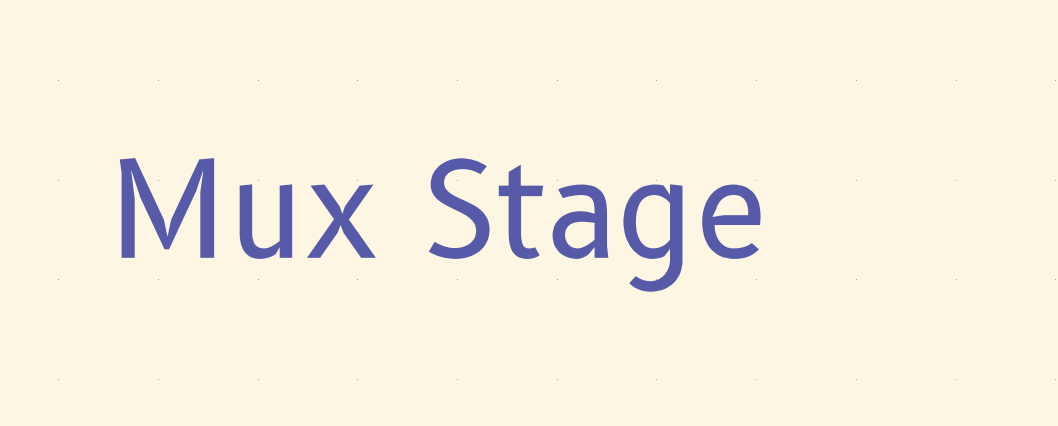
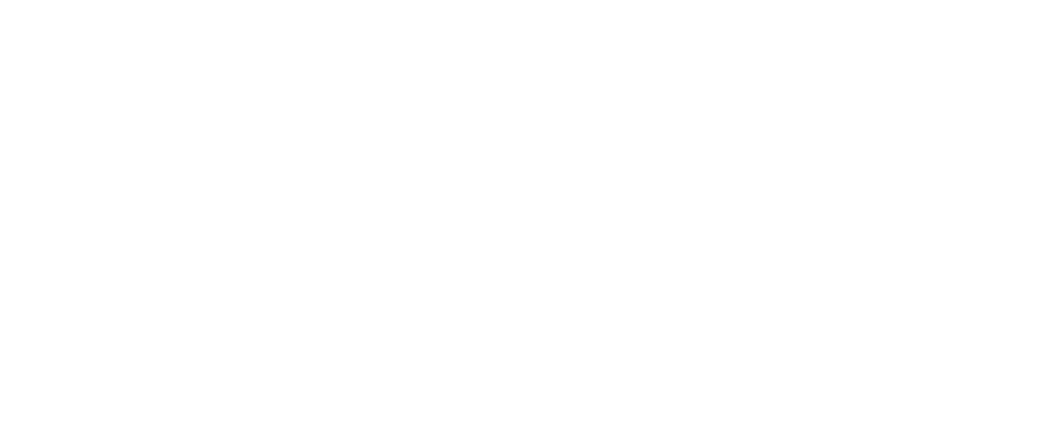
text: Mux Stage (440, 224) -> none

